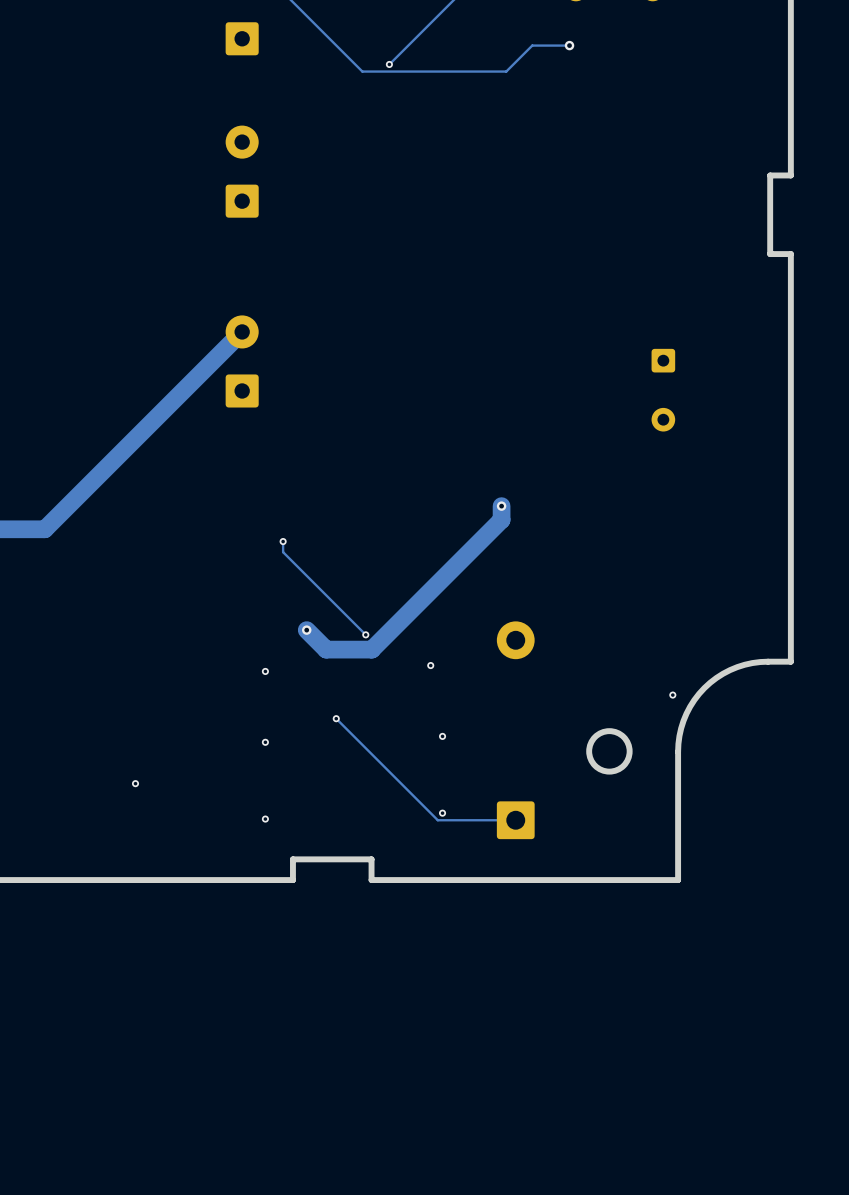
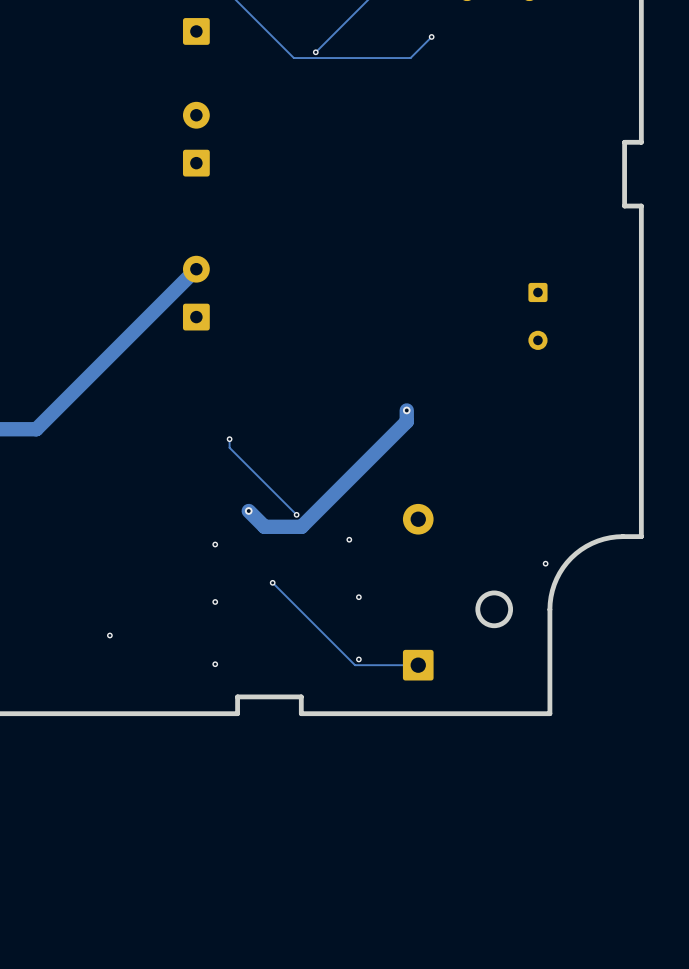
via: none -> (431, 36)
track: (569, 45) (532, 45) -> none
via: (569, 45) -> none

